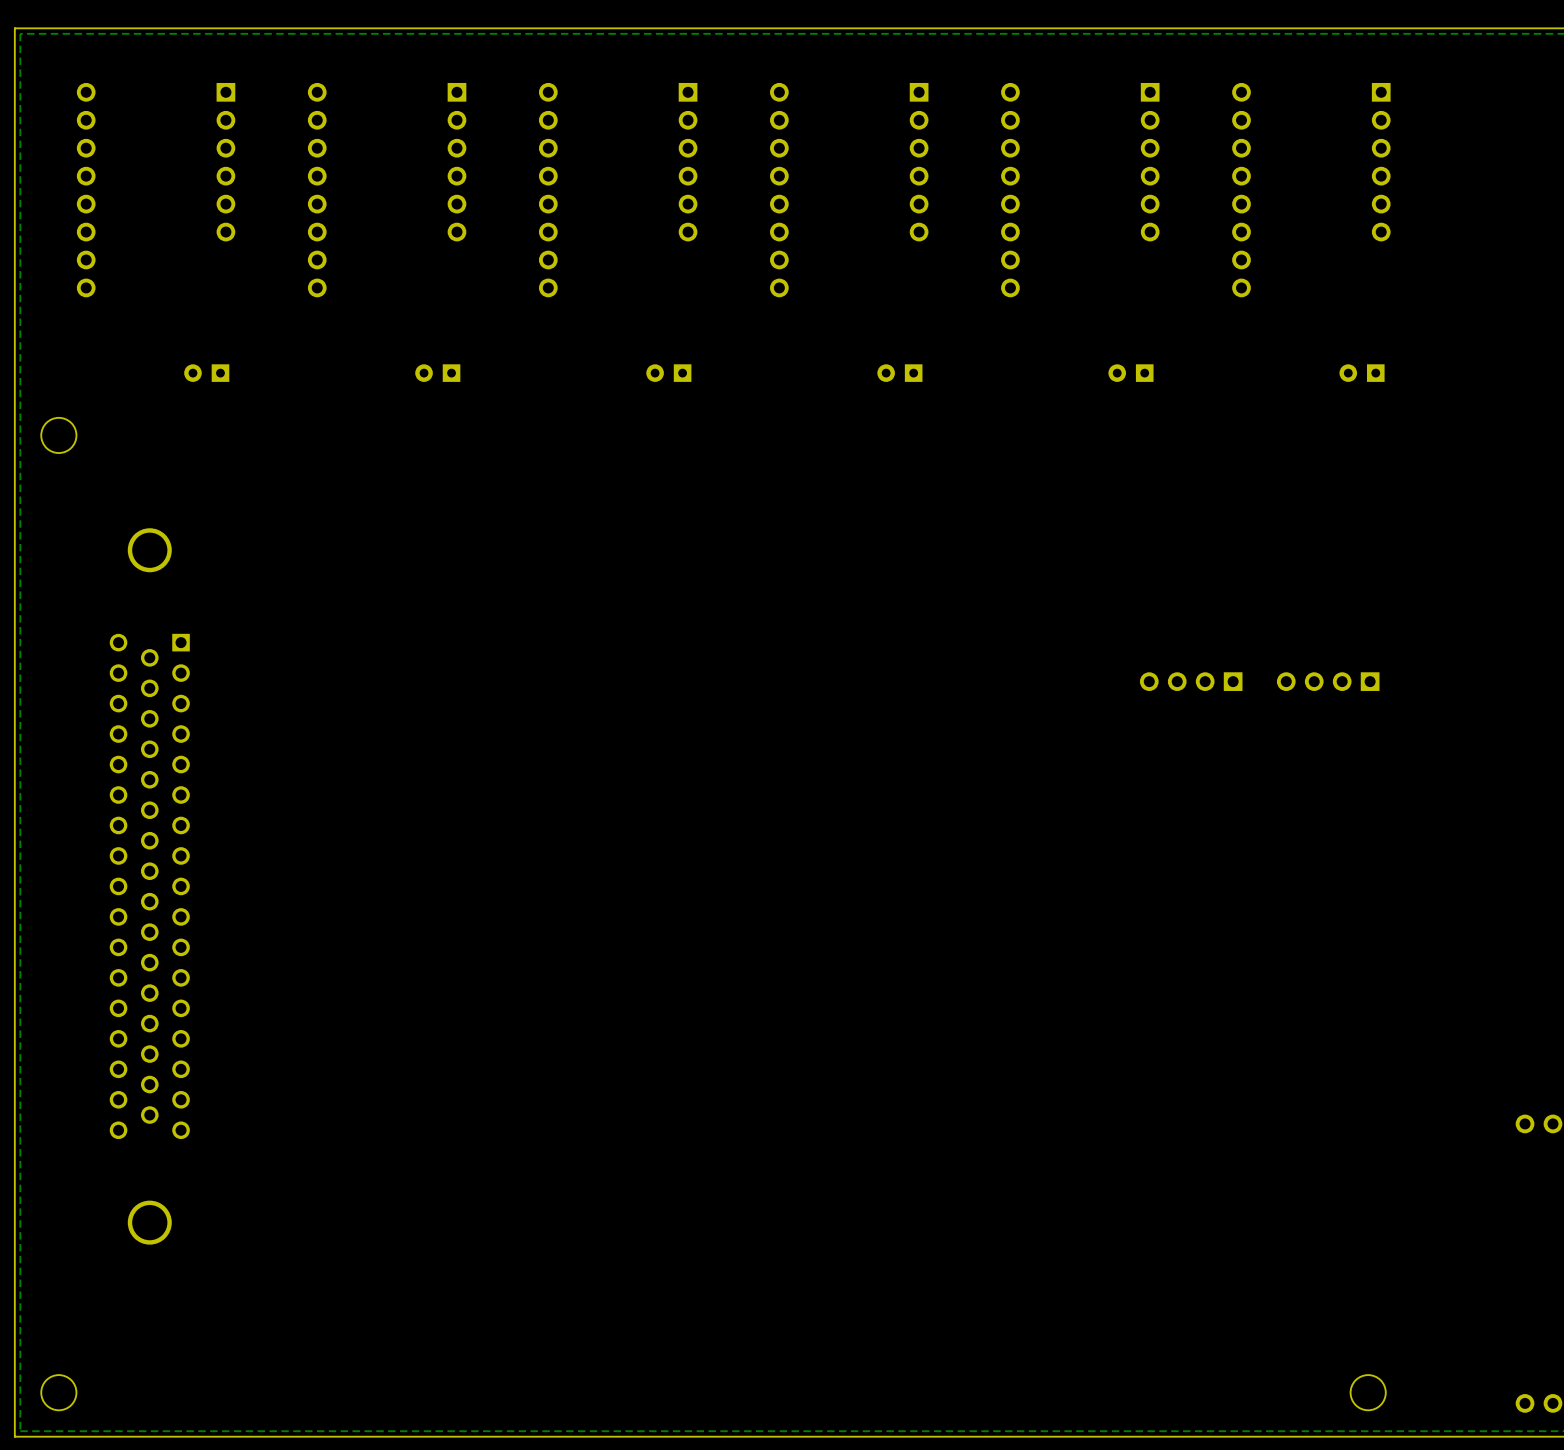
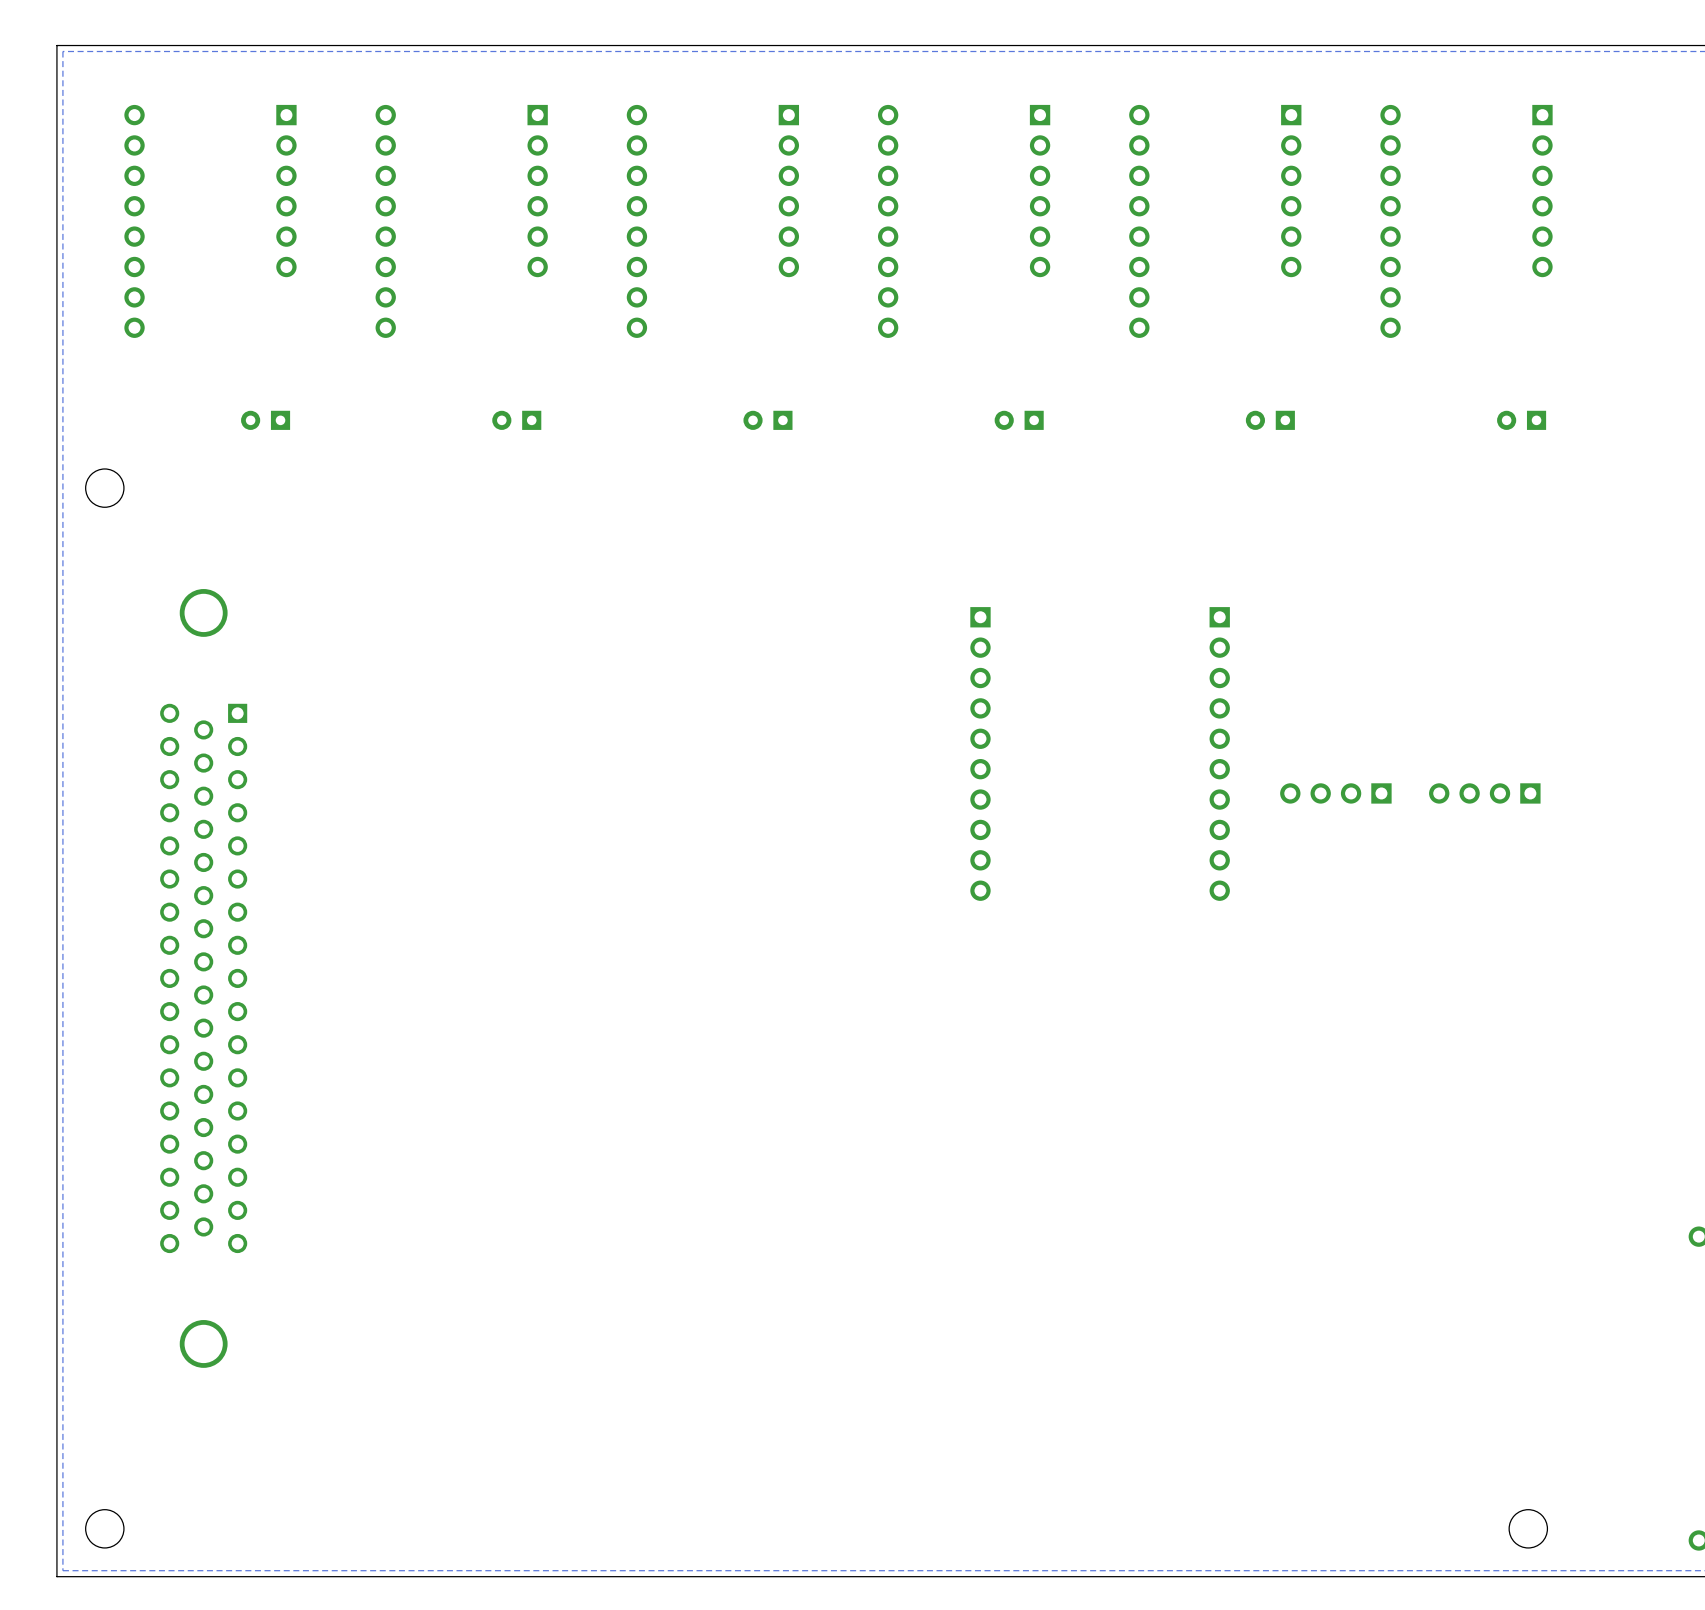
part: none -> (980, 753)
part: none -> (1219, 753)
part position: (1191, 681) -> (1335, 793)
part position: (1328, 681) -> (1484, 793)

